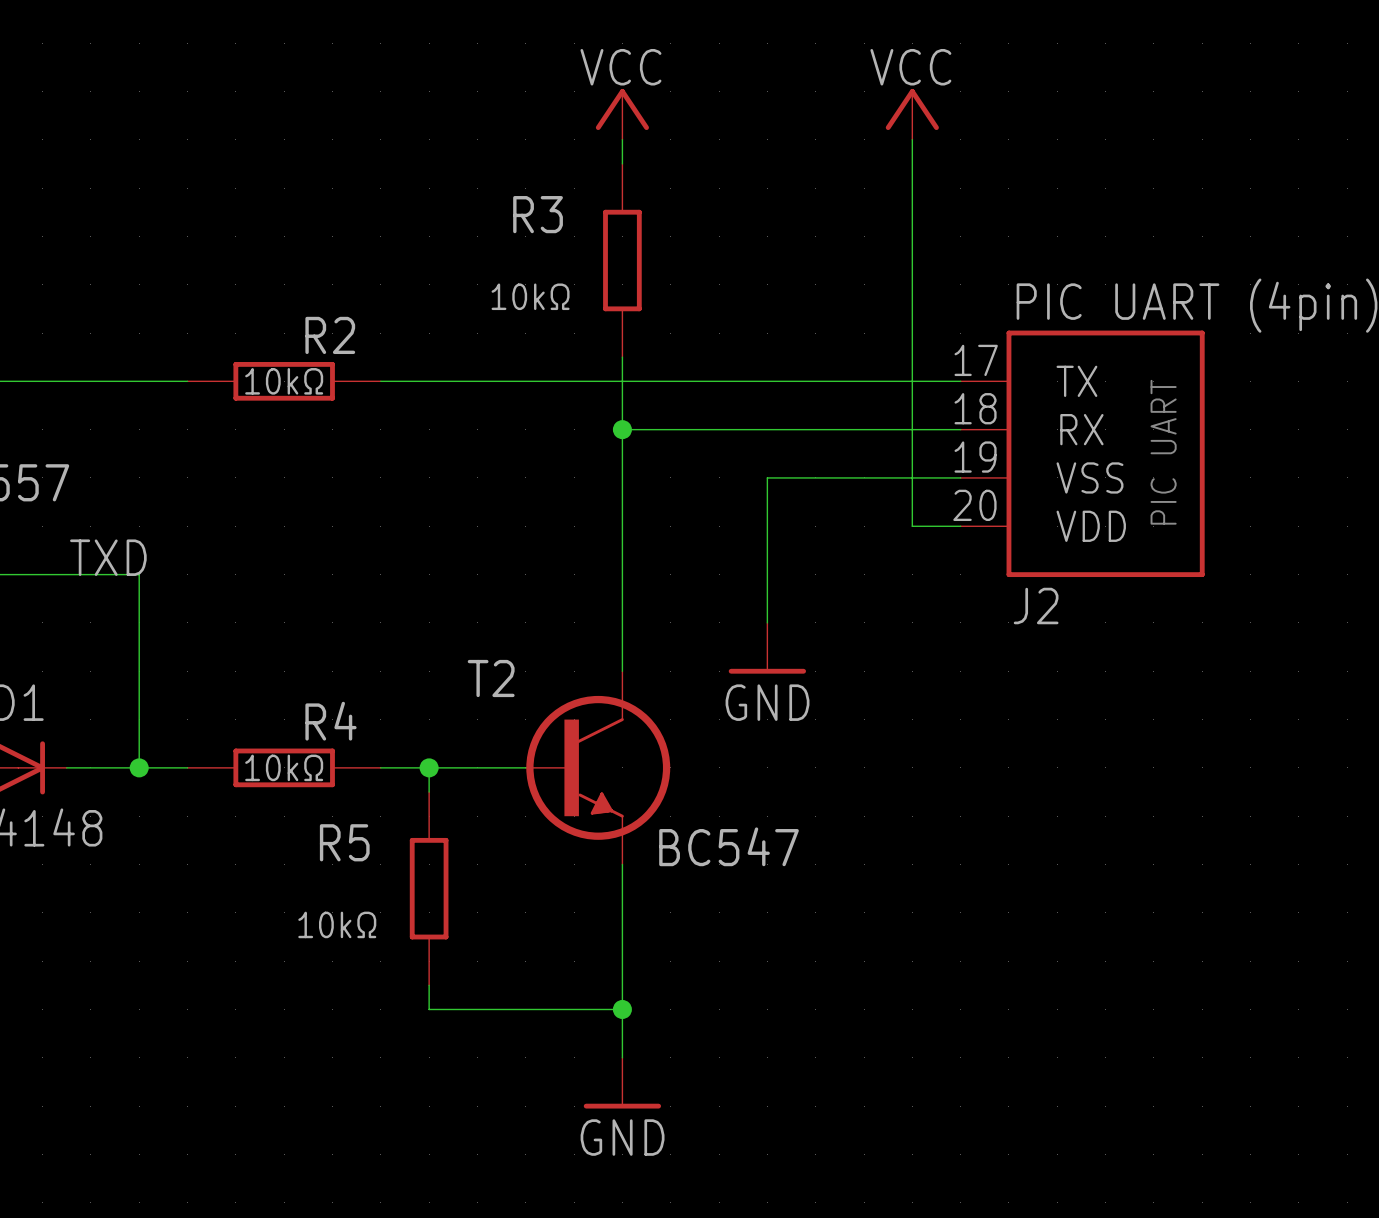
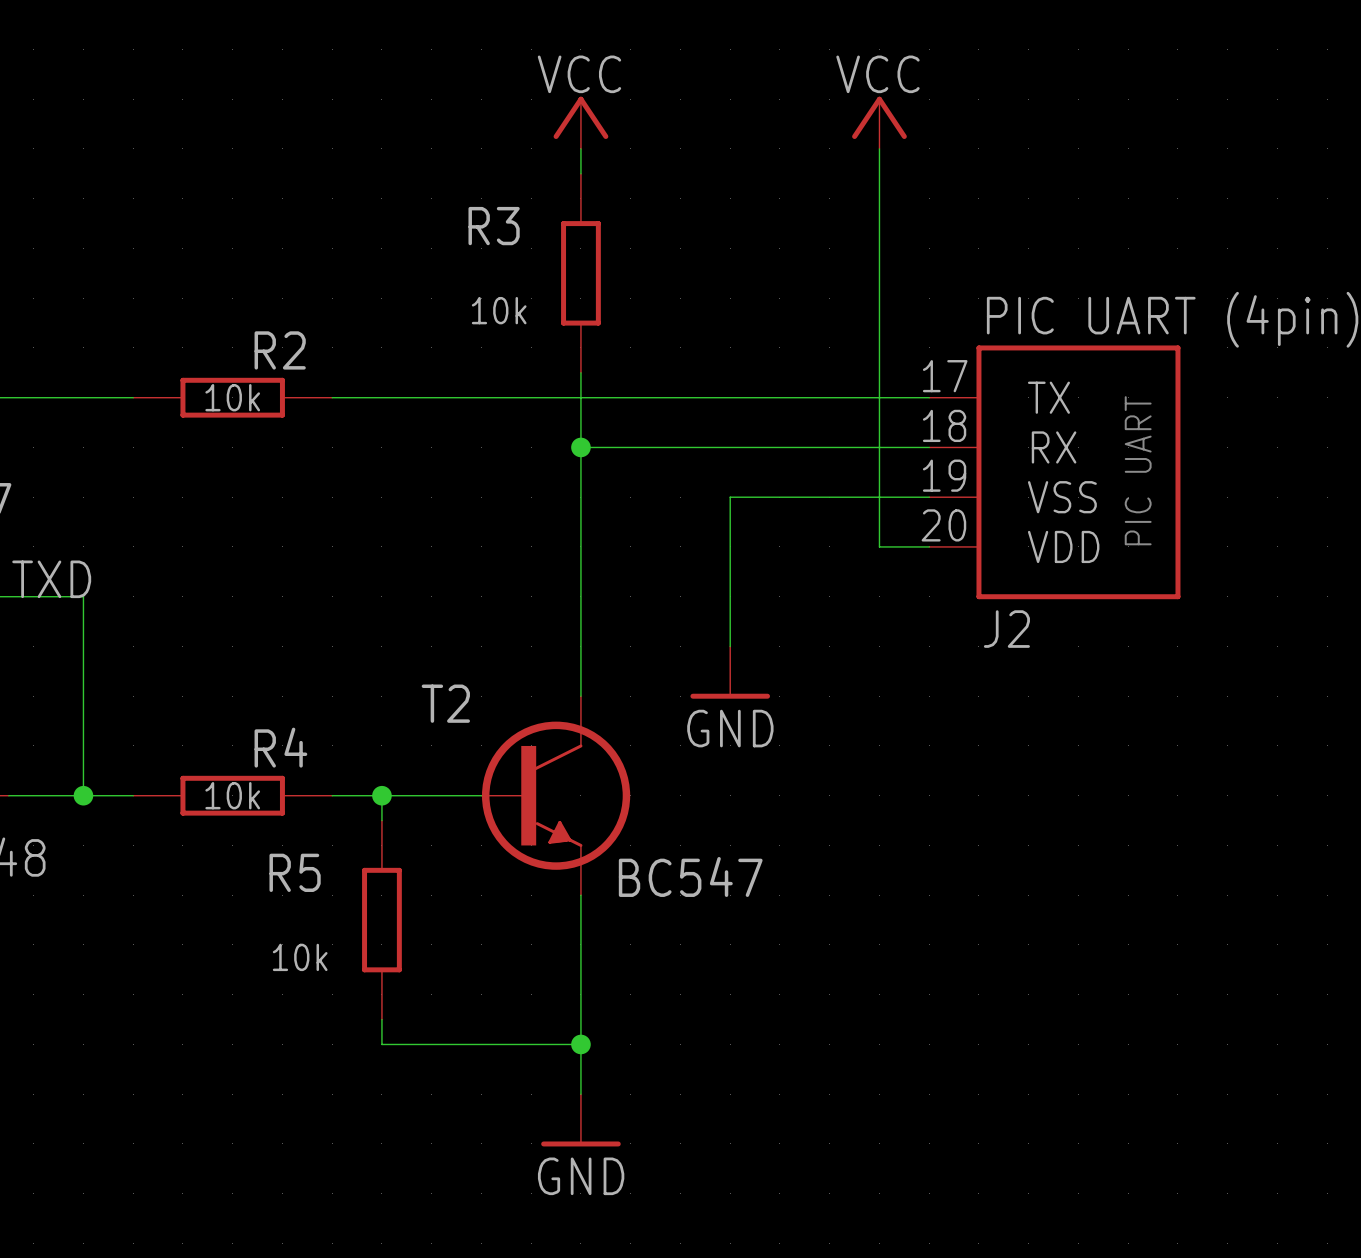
R3 value: 10kΩ (530, 296) -> 10k (499, 310)
R2 value: 10kΩ (284, 381) -> 10k (232, 397)
R4 value: 10kΩ (284, 767) -> 10k (232, 795)
R5 value: 10kΩ (337, 924) -> 10k (300, 957)

